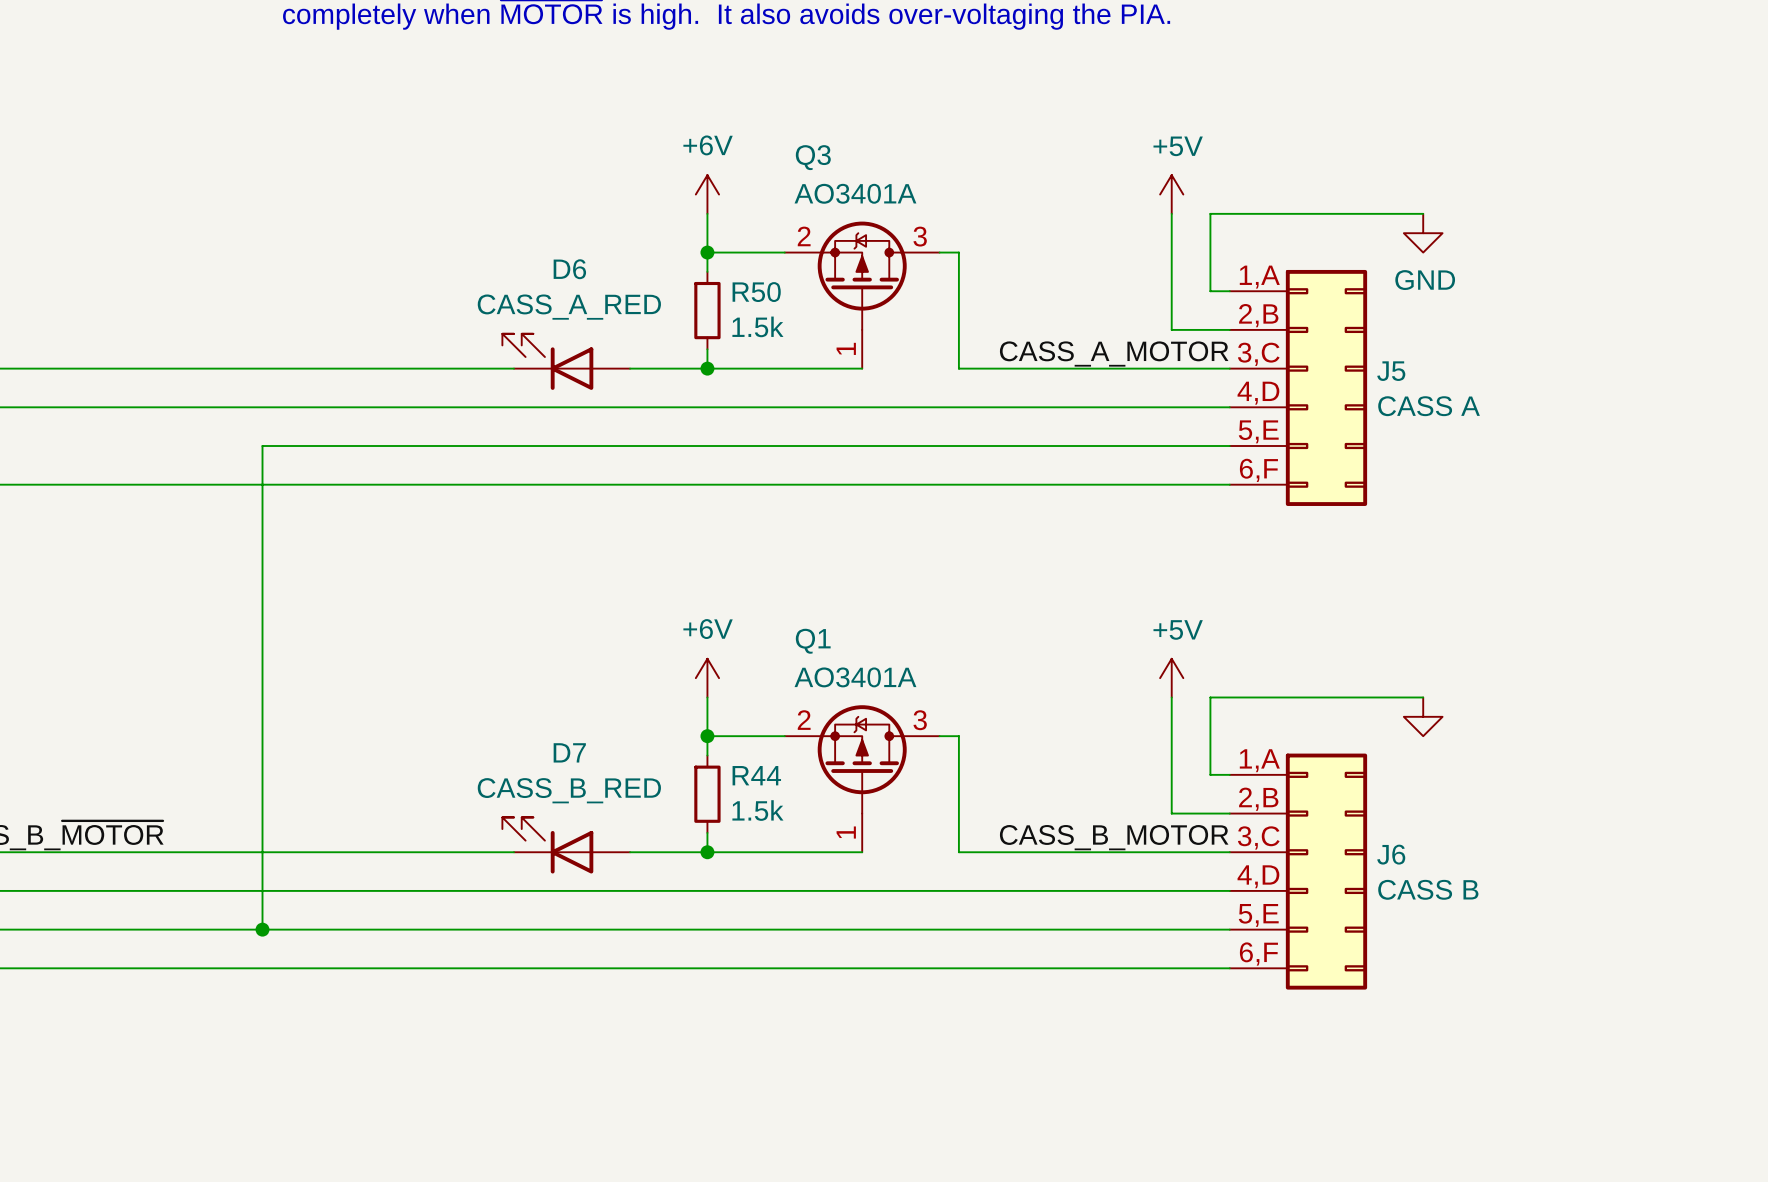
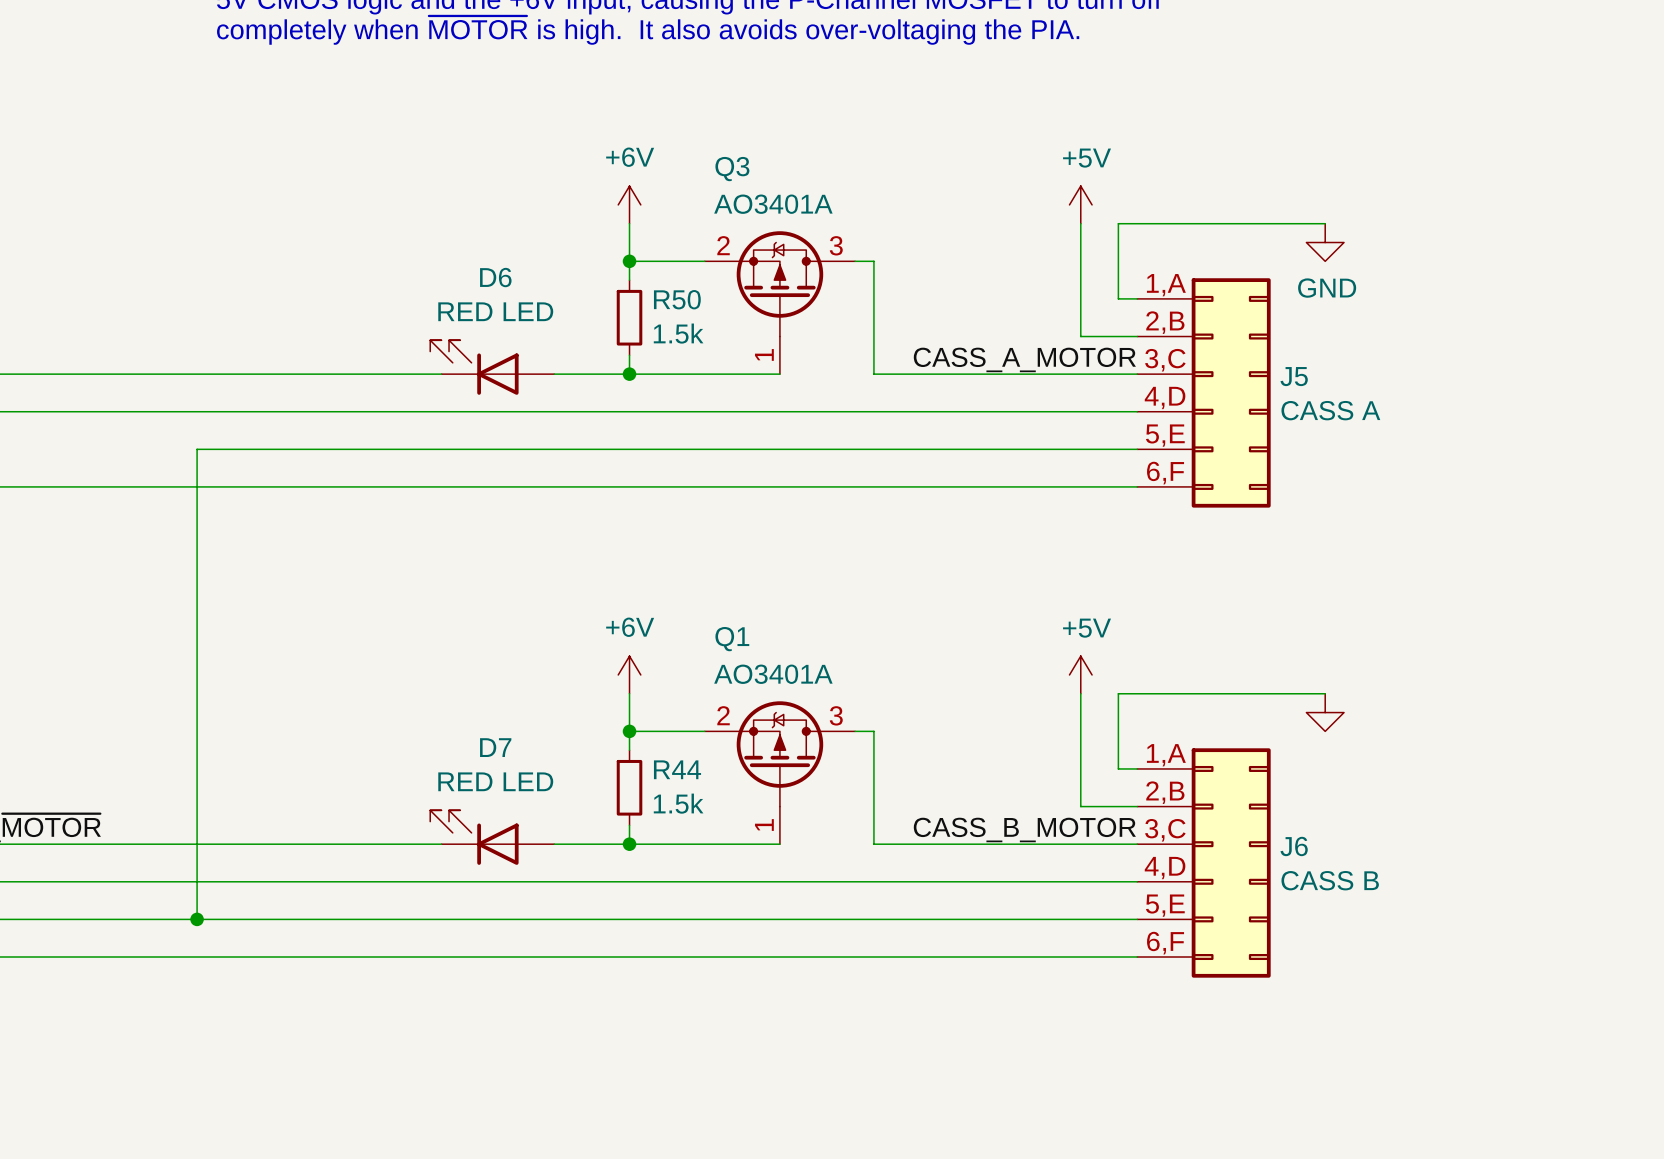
D6 value: CASS_A_RED (569, 307) -> RED LED (495, 311)
D7 value: CASS_B_RED (569, 790) -> RED LED (495, 781)

